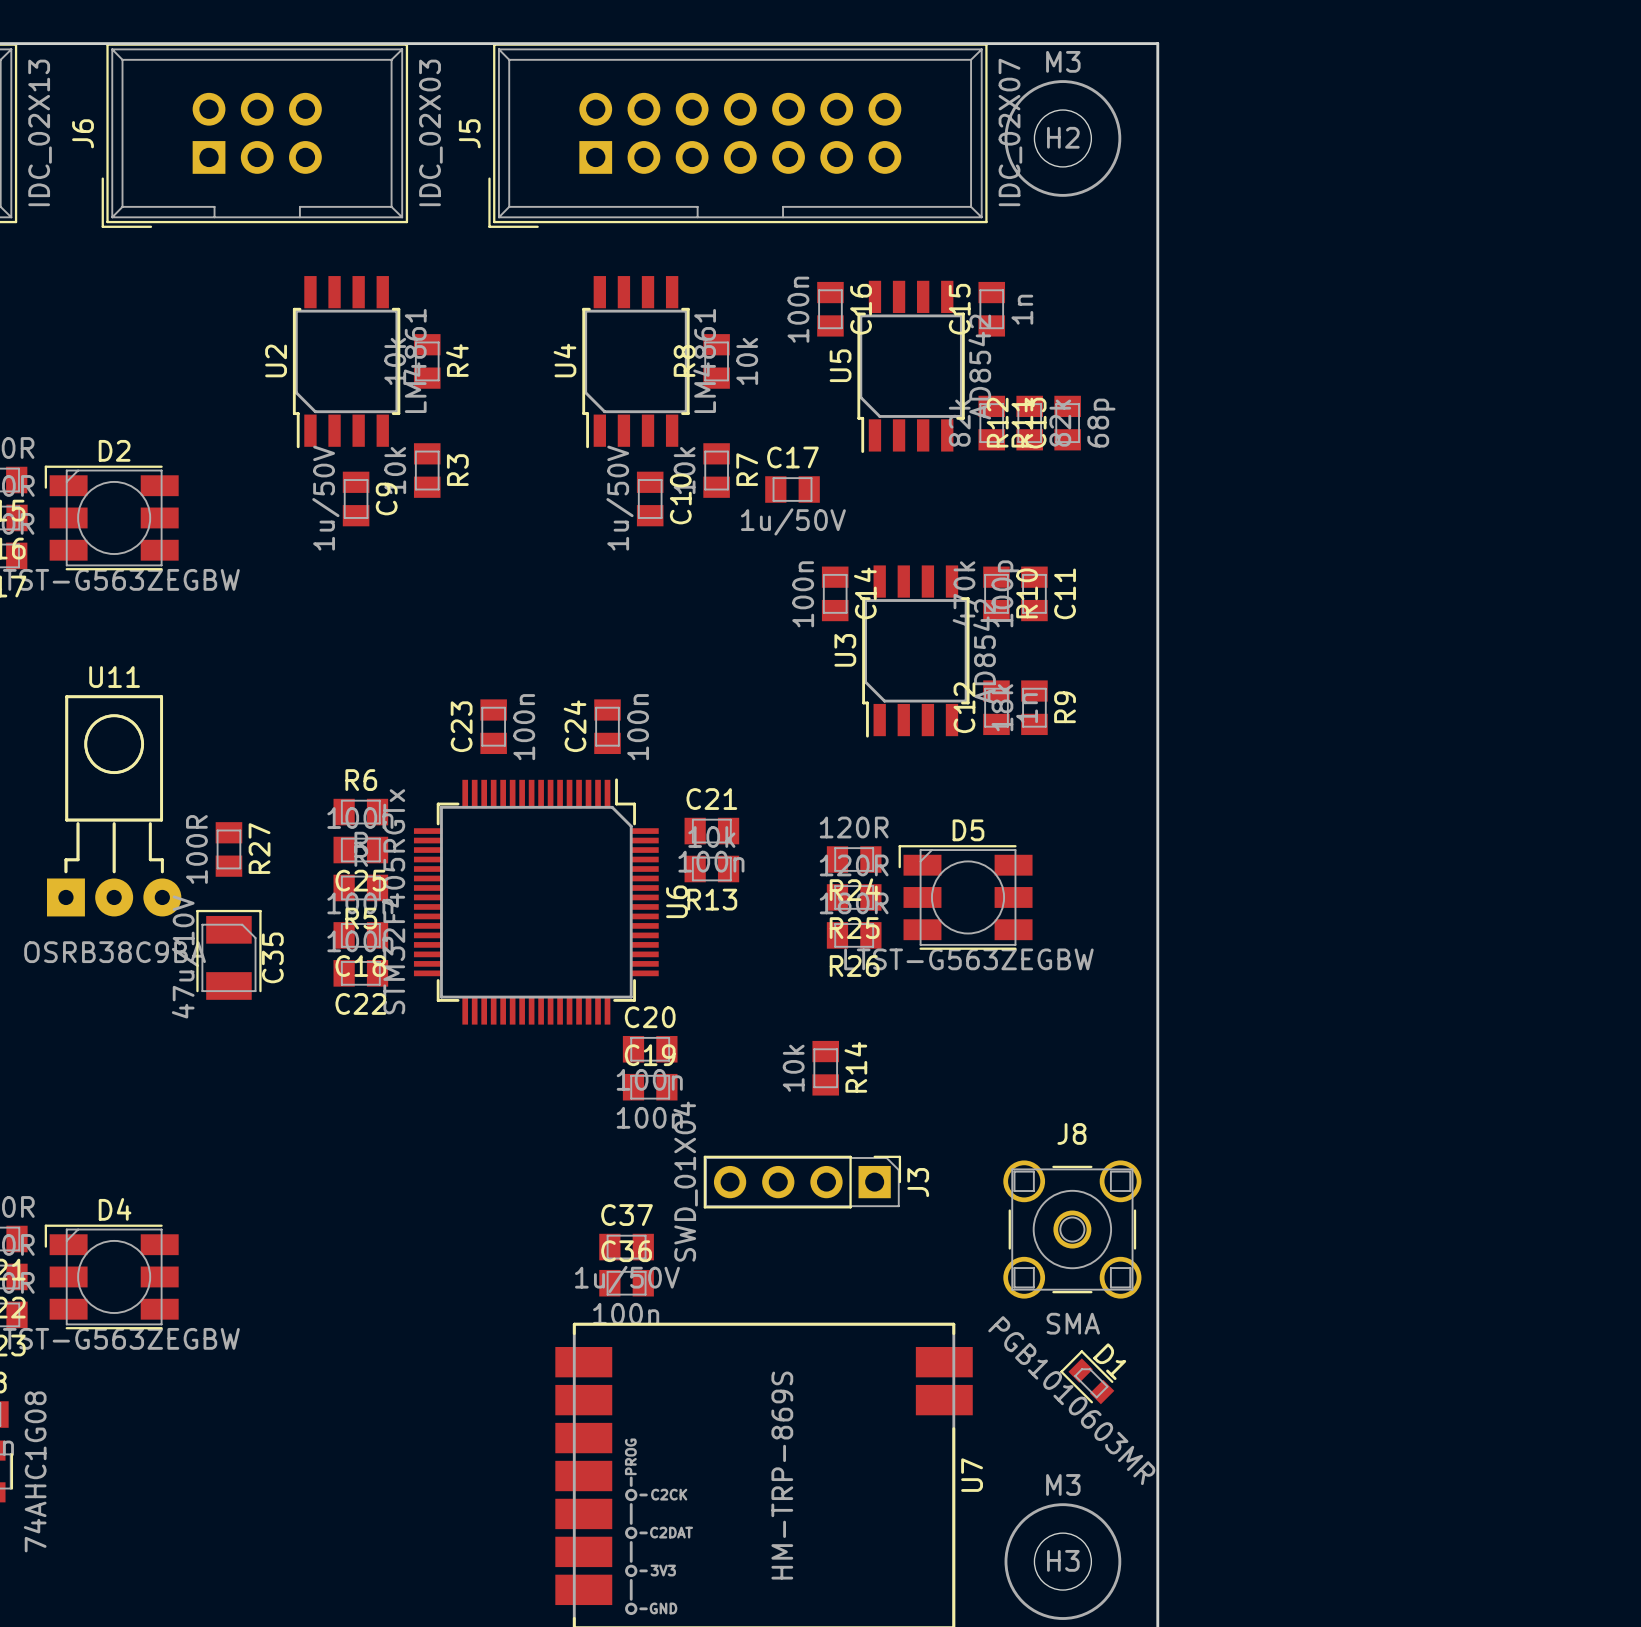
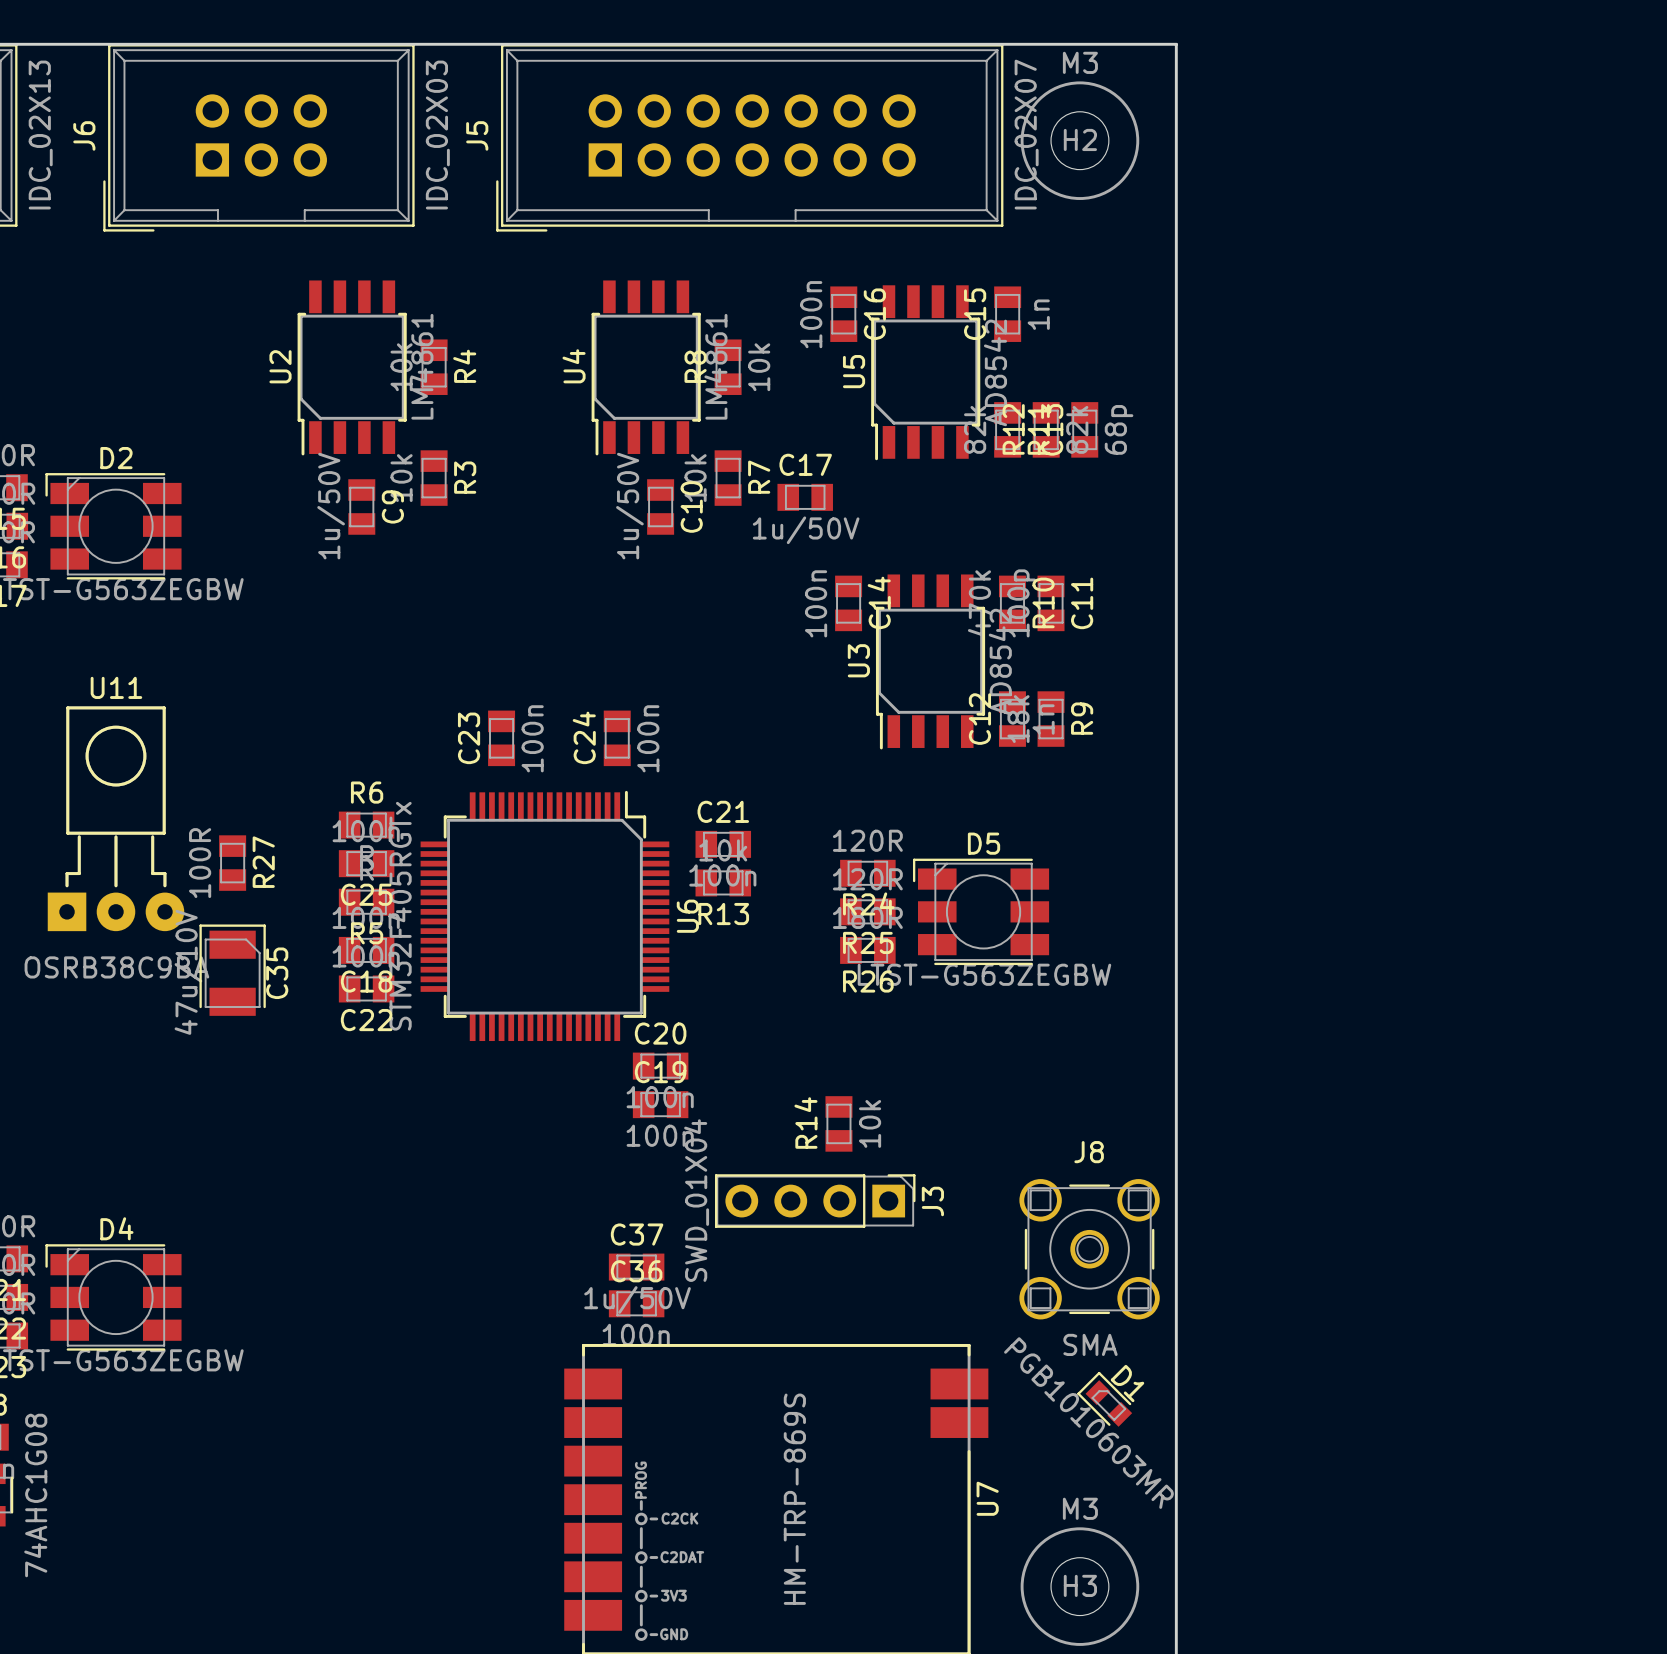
R14 name position: R14 (855, 1067) -> R14 (805, 1123)
R14 value position: 10k (793, 1068) -> 10k (870, 1123)
R14 position: (825, 1068) -> (838, 1123)

